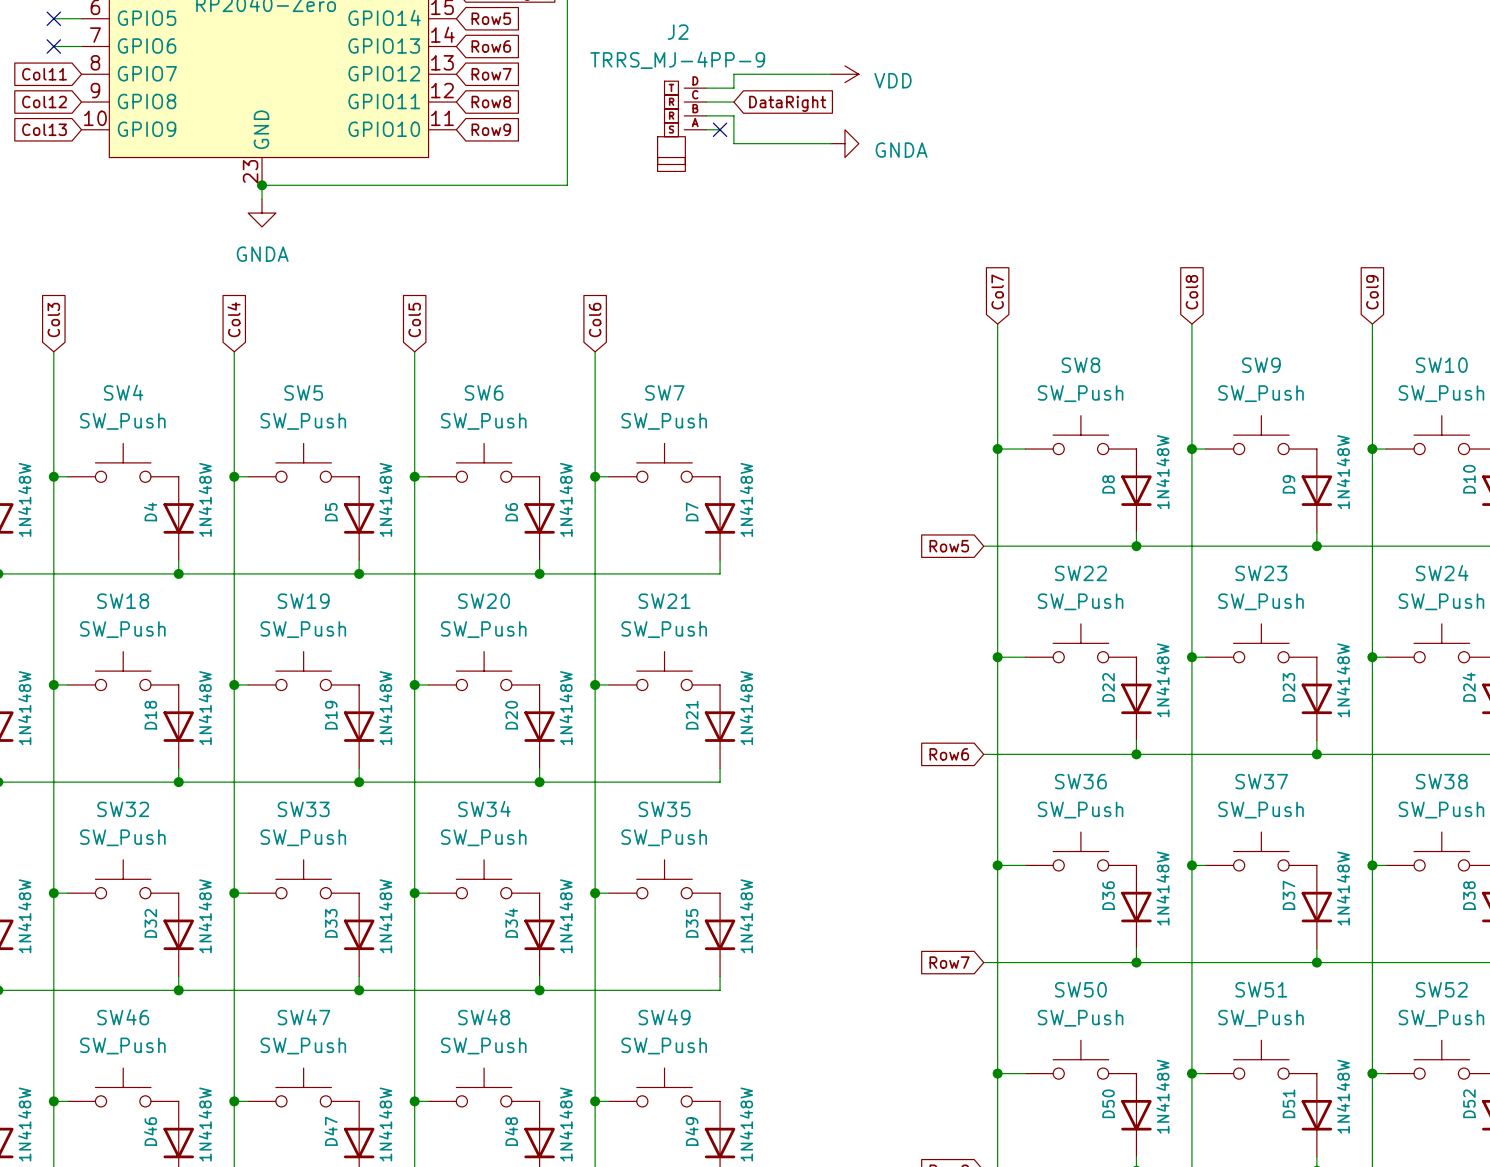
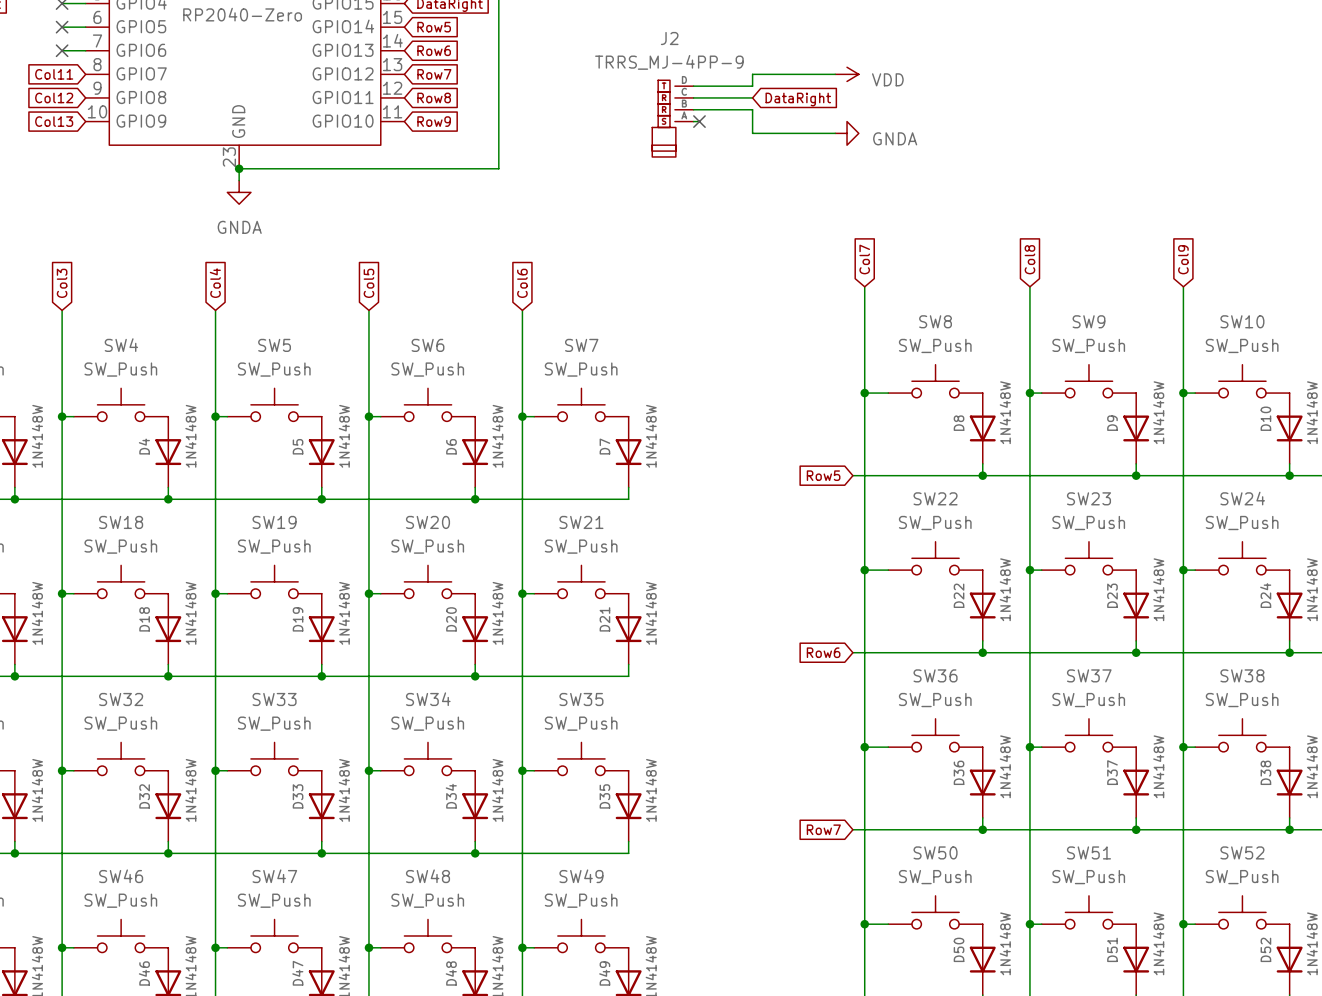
wire: (831, 74) (733, 74) (733, 88) (706, 88) -> none
power symbol position: VDD (844, 74) -> VDD (847, 74)
wire: none -> (835, 74) (752, 74) (752, 86) (693, 86)
wire: (706, 102) (733, 102) -> none
wire: none -> (693, 97) (752, 97)
global label position: DataRight (787, 103) -> DataRight (798, 99)
wire: (706, 115) (733, 115) (733, 143) (831, 143) -> none
wire: none -> (693, 109) (752, 109) (752, 133) (835, 133)
J2 position: (681, 126) -> (672, 118)
wire: (706, 129) (720, 129) -> none
no-connect mark: (720, 129) -> none
wire: none -> (693, 121) (699, 121)
no-connect mark: none -> (699, 121)
power symbol position: GNDA (844, 143) -> GNDA (847, 133)

